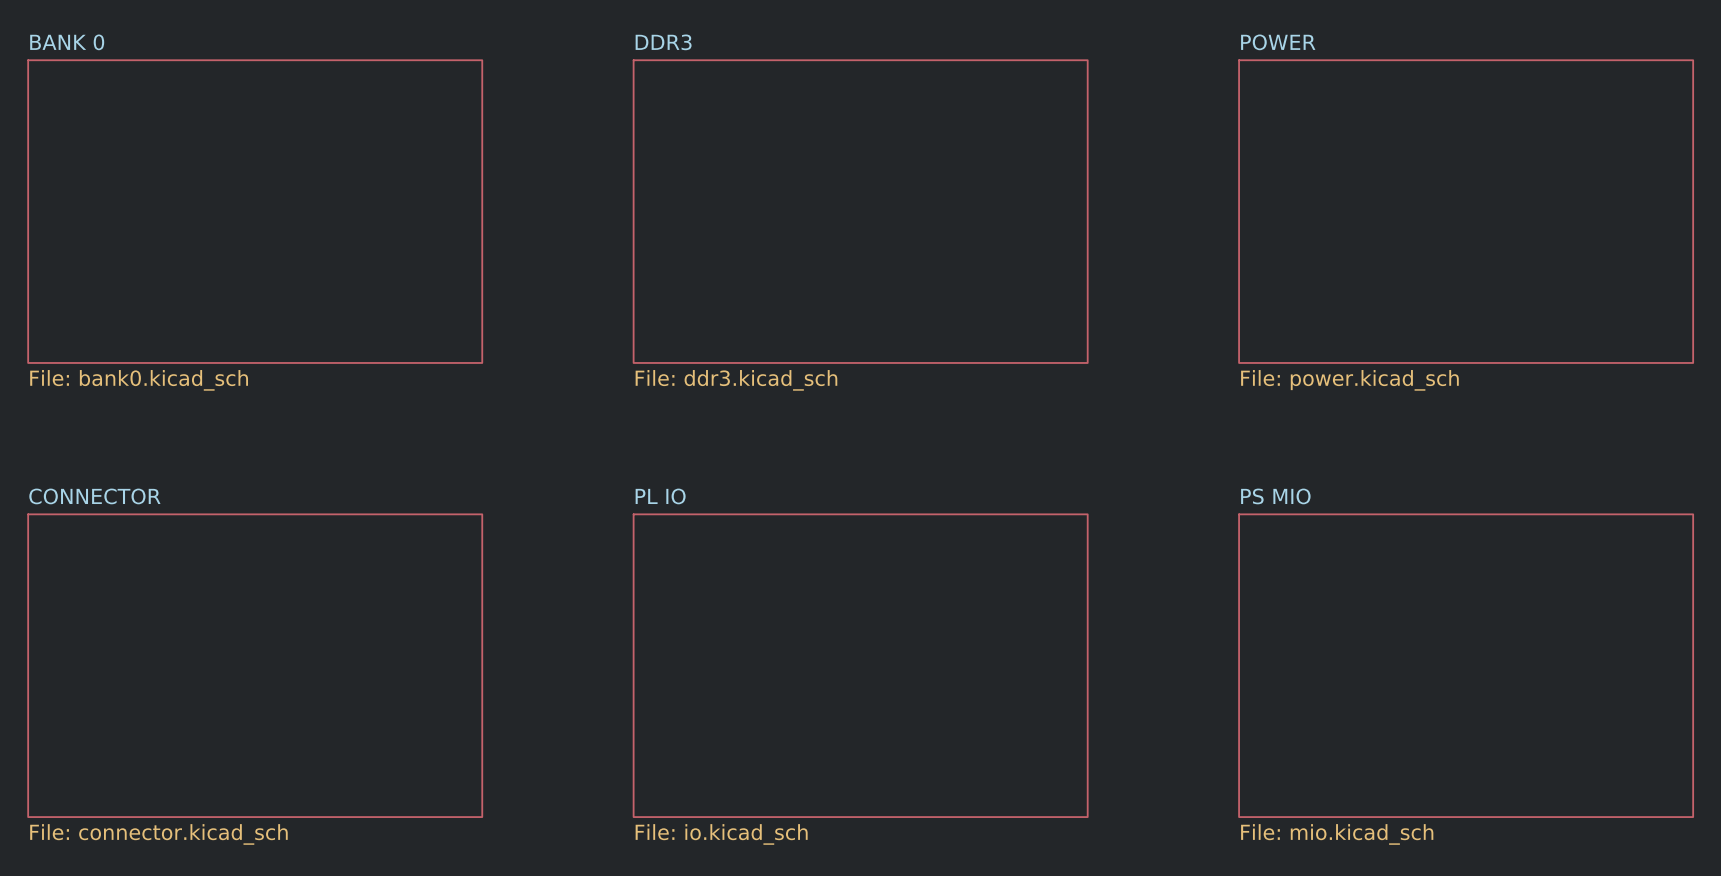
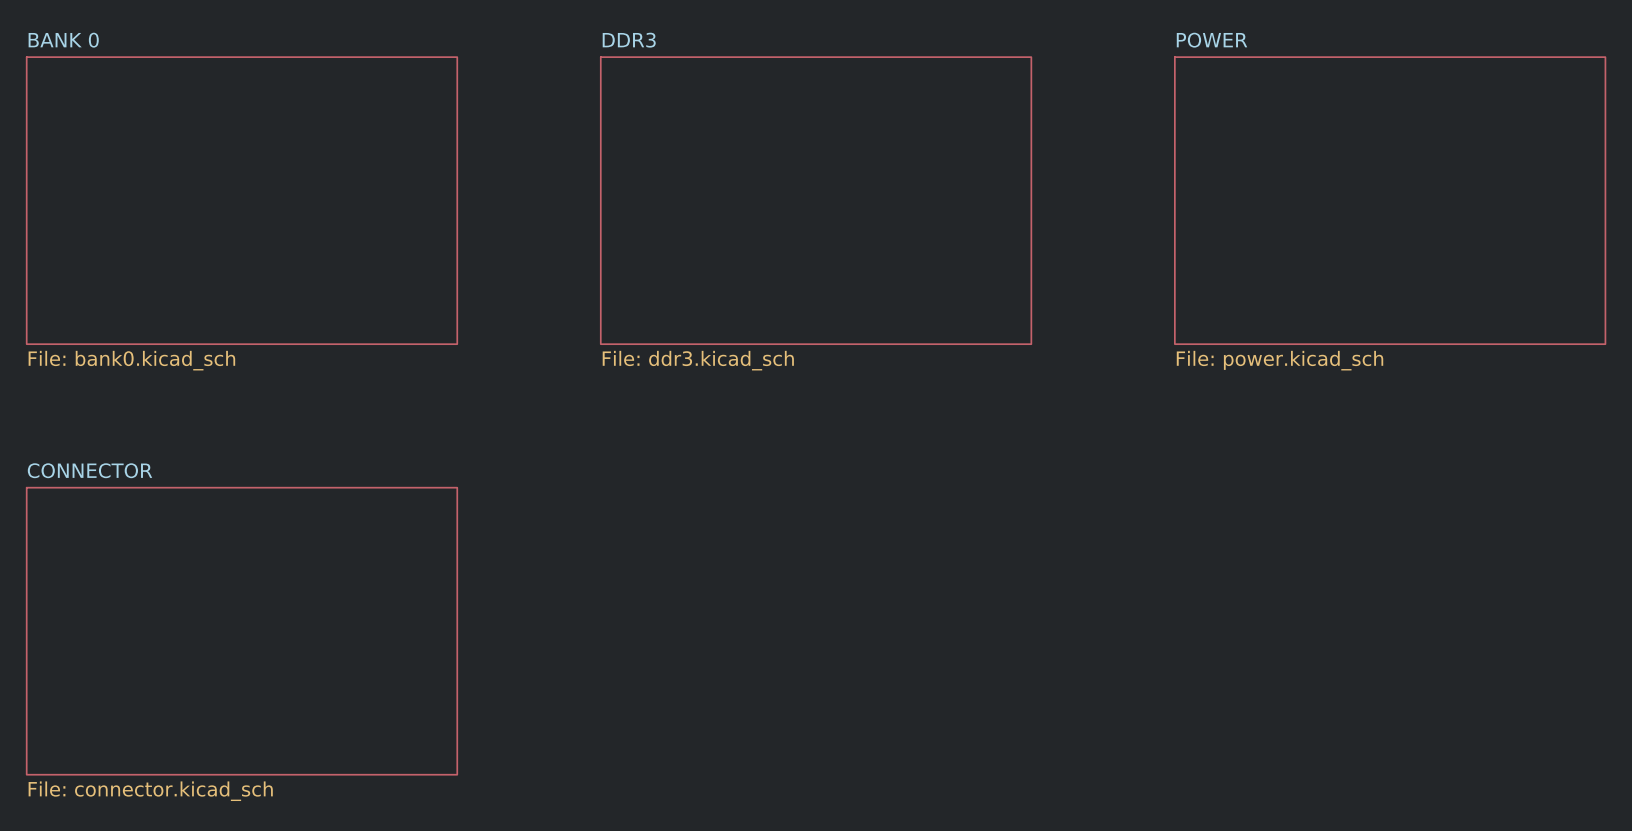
sheet PL IO: File: io.kicad_sch (860, 665) -> none
sheet PS MIO: File: mio.kicad_sch (1466, 665) -> none

